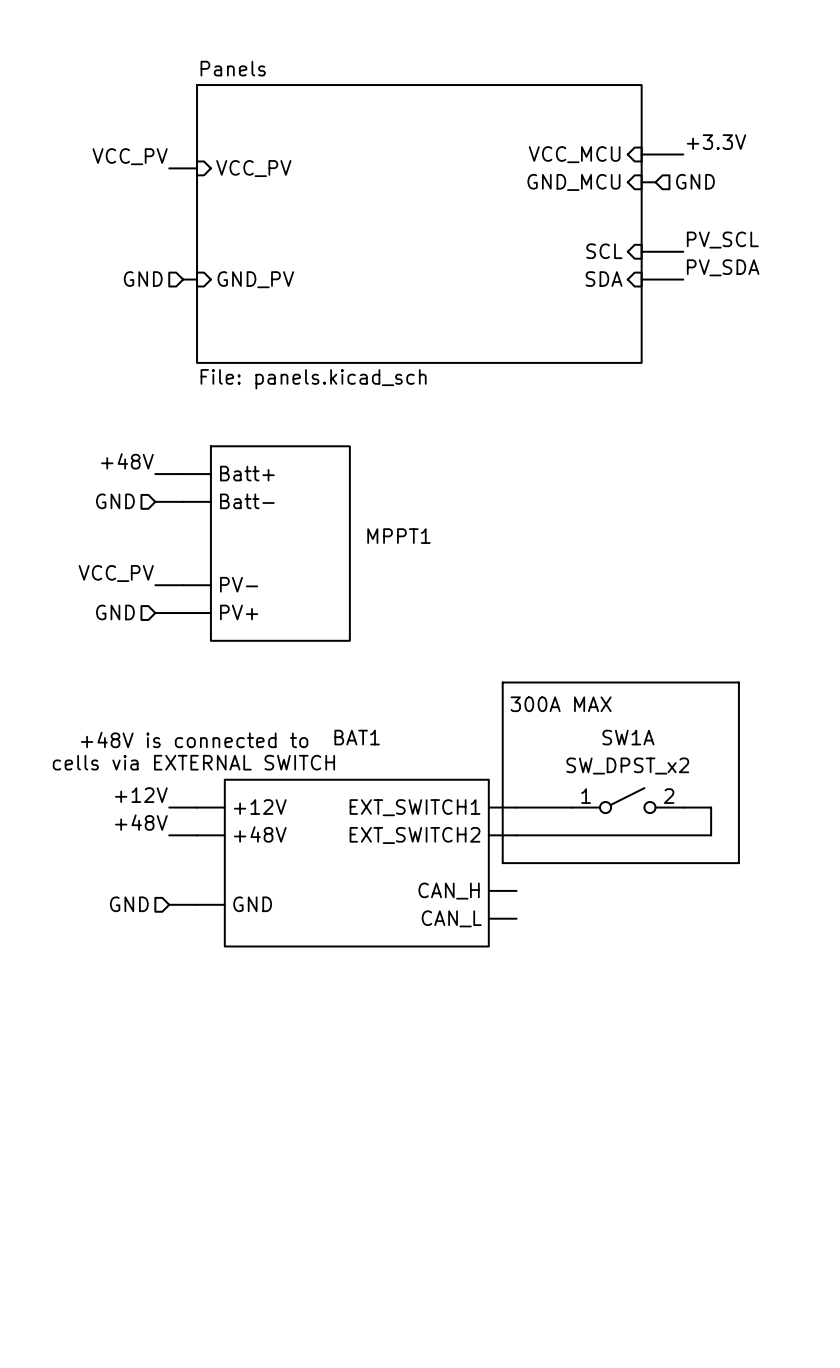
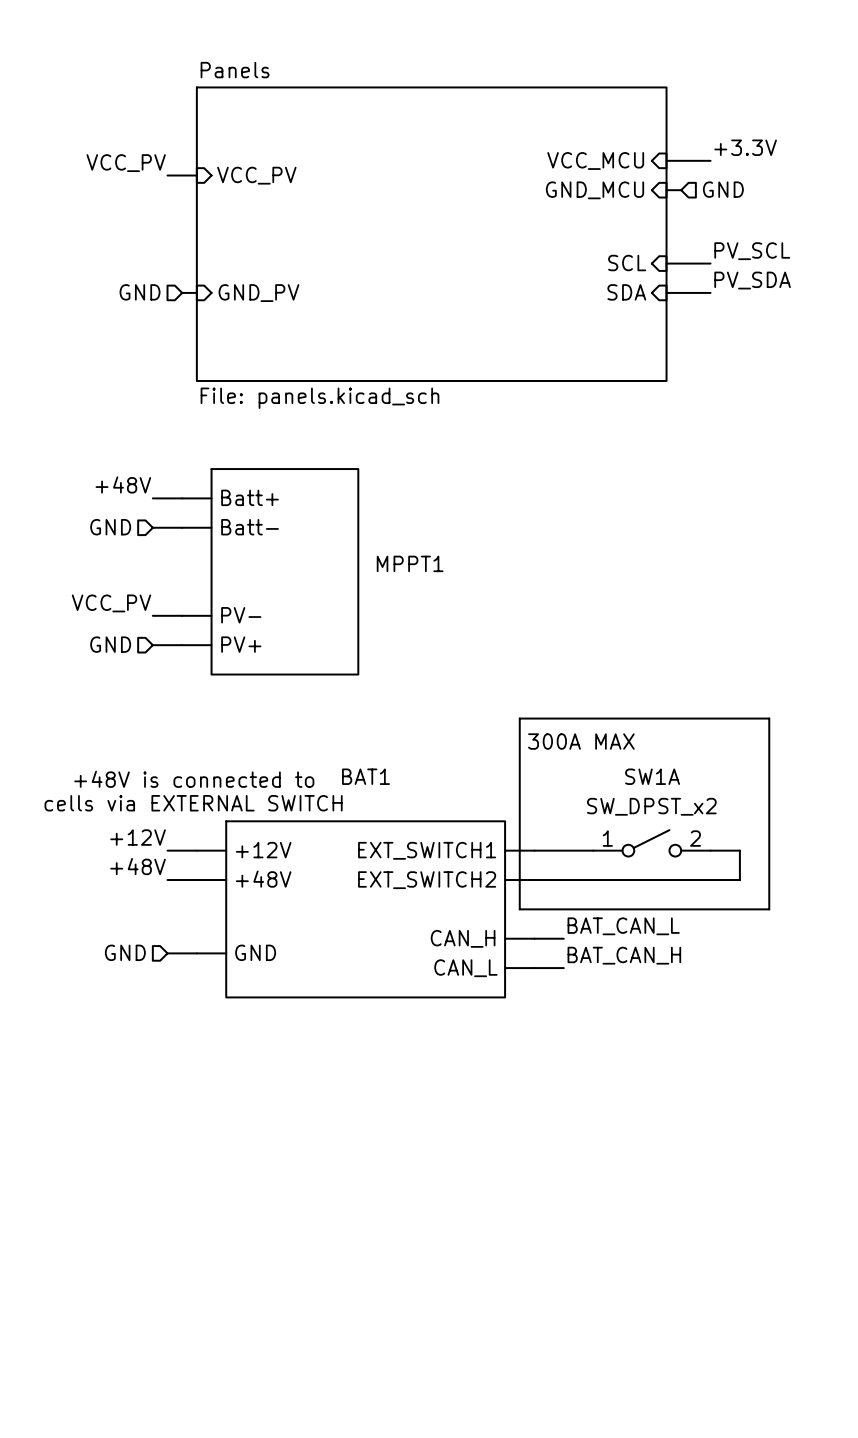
label: none -> BAT_CAN_L (623, 926)
wire: none -> (534, 938) (563, 938)
label: none -> BAT_CAN_H (624, 955)
wire: none -> (534, 968) (563, 968)

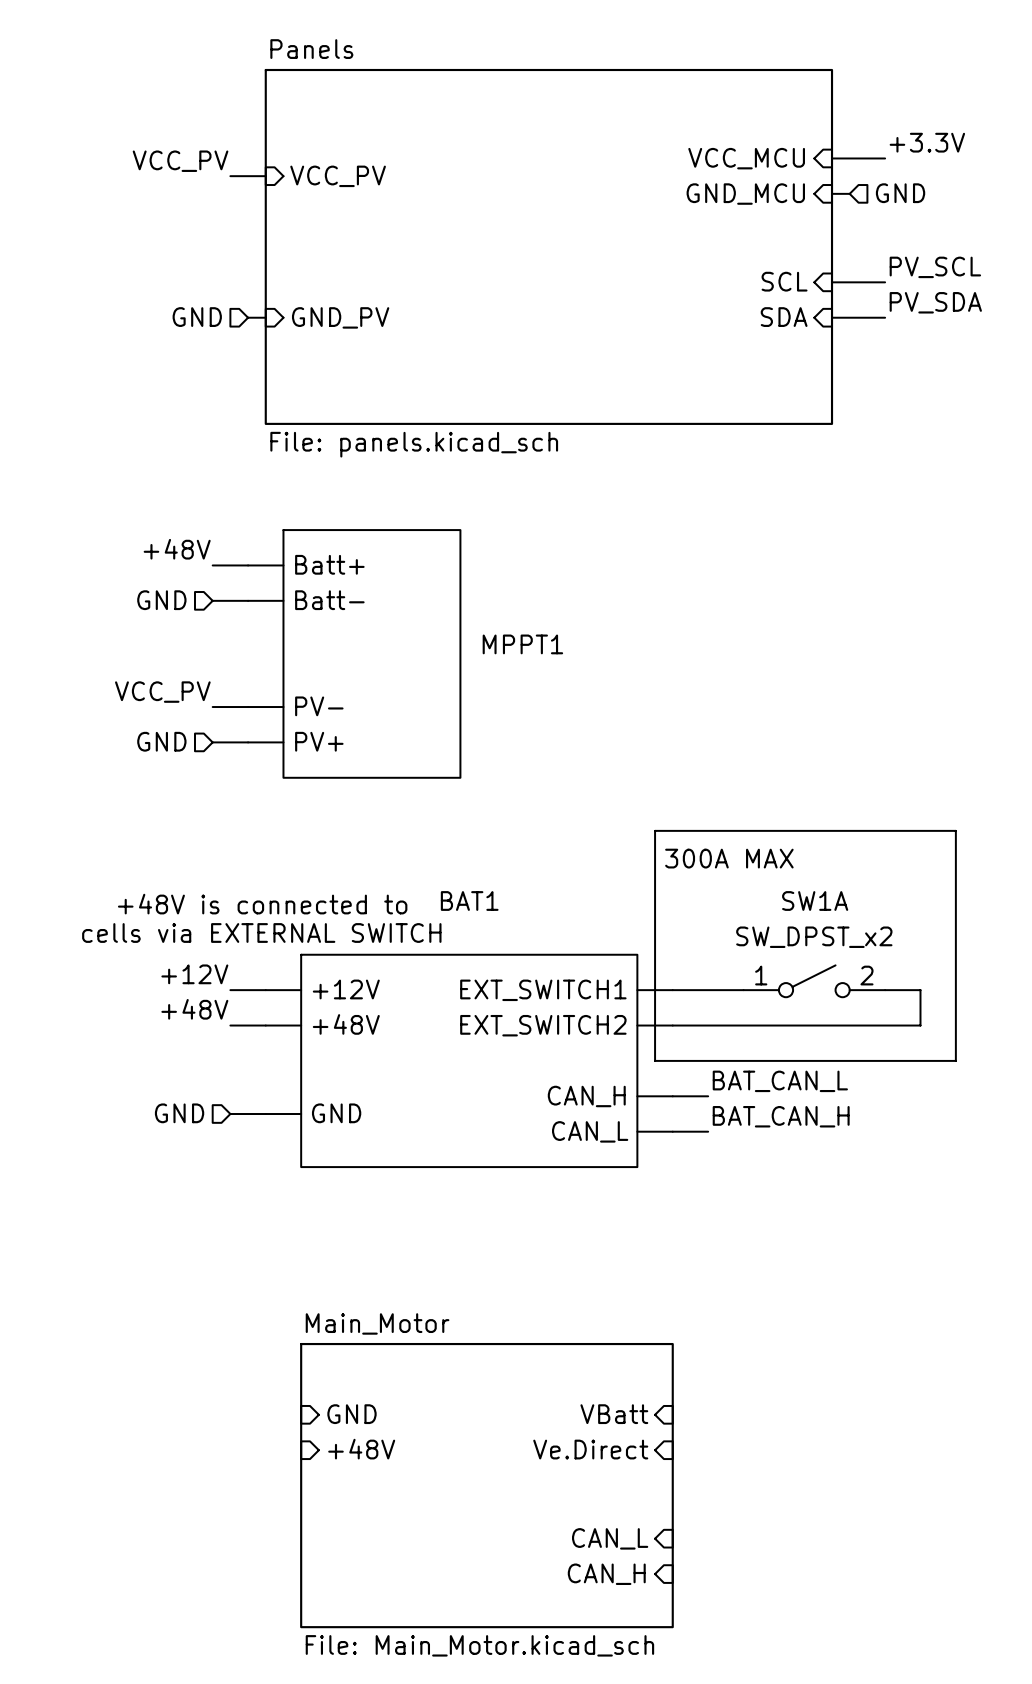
sheet pin: none -> GND (352, 1414)
sheet pin: none -> VBatt (614, 1414)
sheet pin: none -> +48V (361, 1449)
sheet pin: none -> Ve.Direct (590, 1449)
sheet Main_Motor: none -> File: Main_Motor.kicad_sch (486, 1485)
sheet pin: none -> CAN_L (610, 1538)
sheet pin: none -> CAN_H (606, 1574)

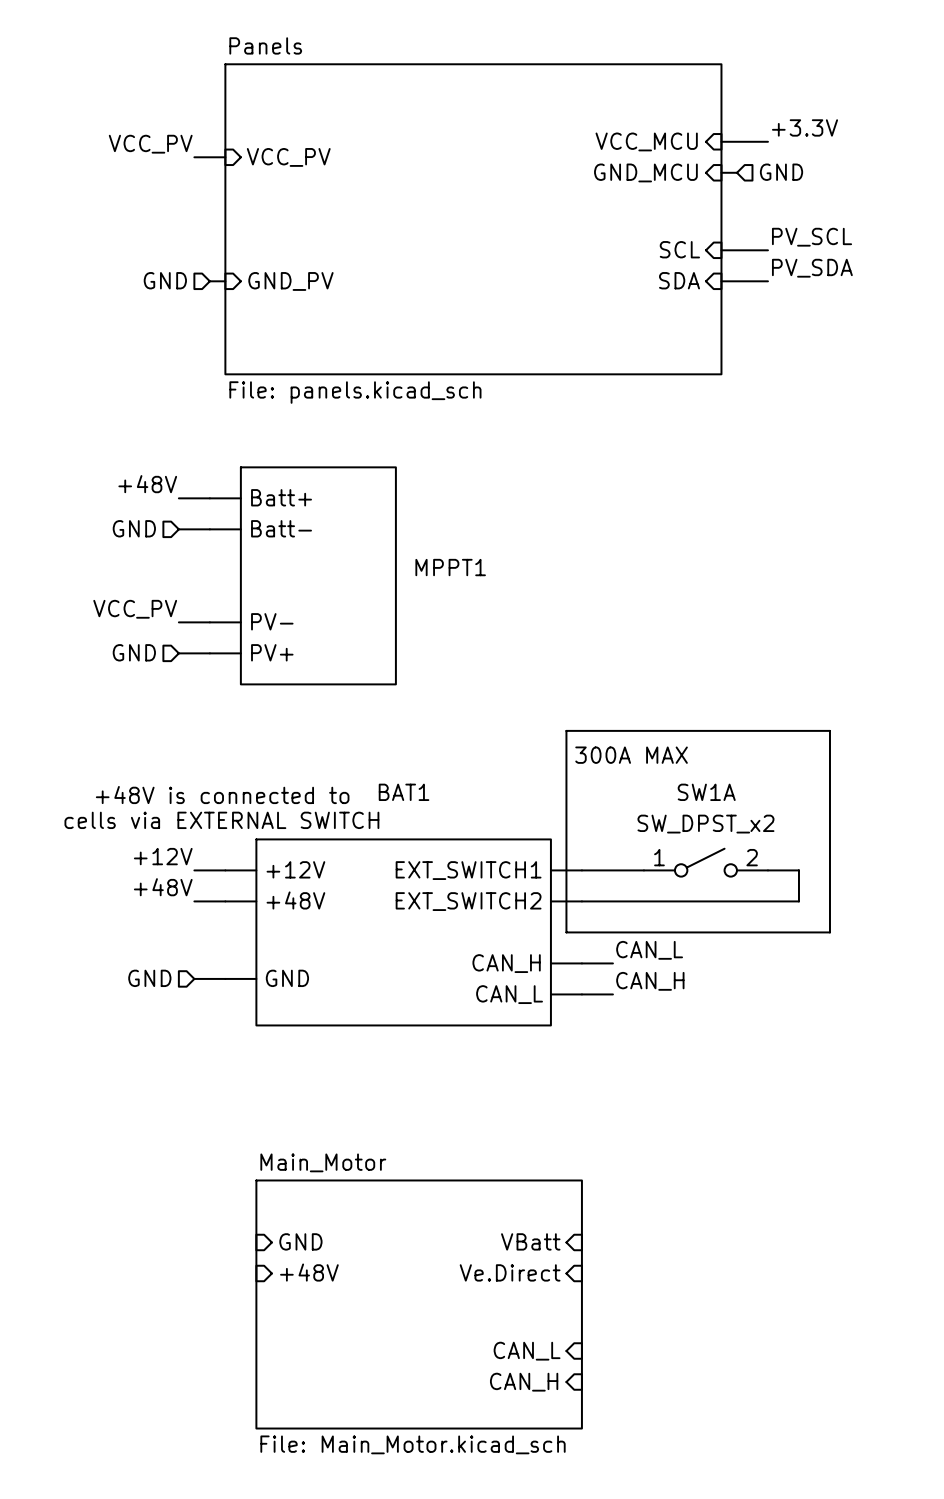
label: BAT_CAN_L (780, 1081) -> CAN_L (649, 950)
label: BAT_CAN_H (781, 1116) -> CAN_H (650, 981)

